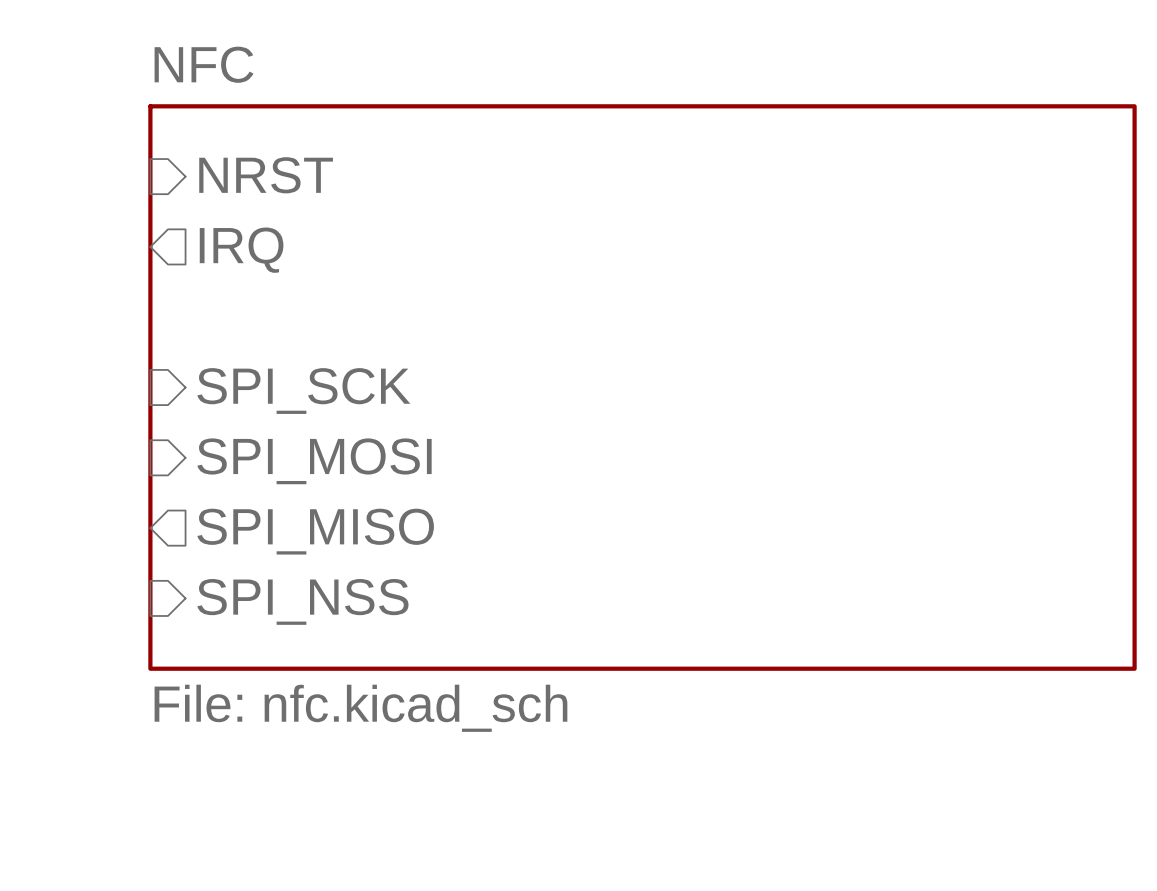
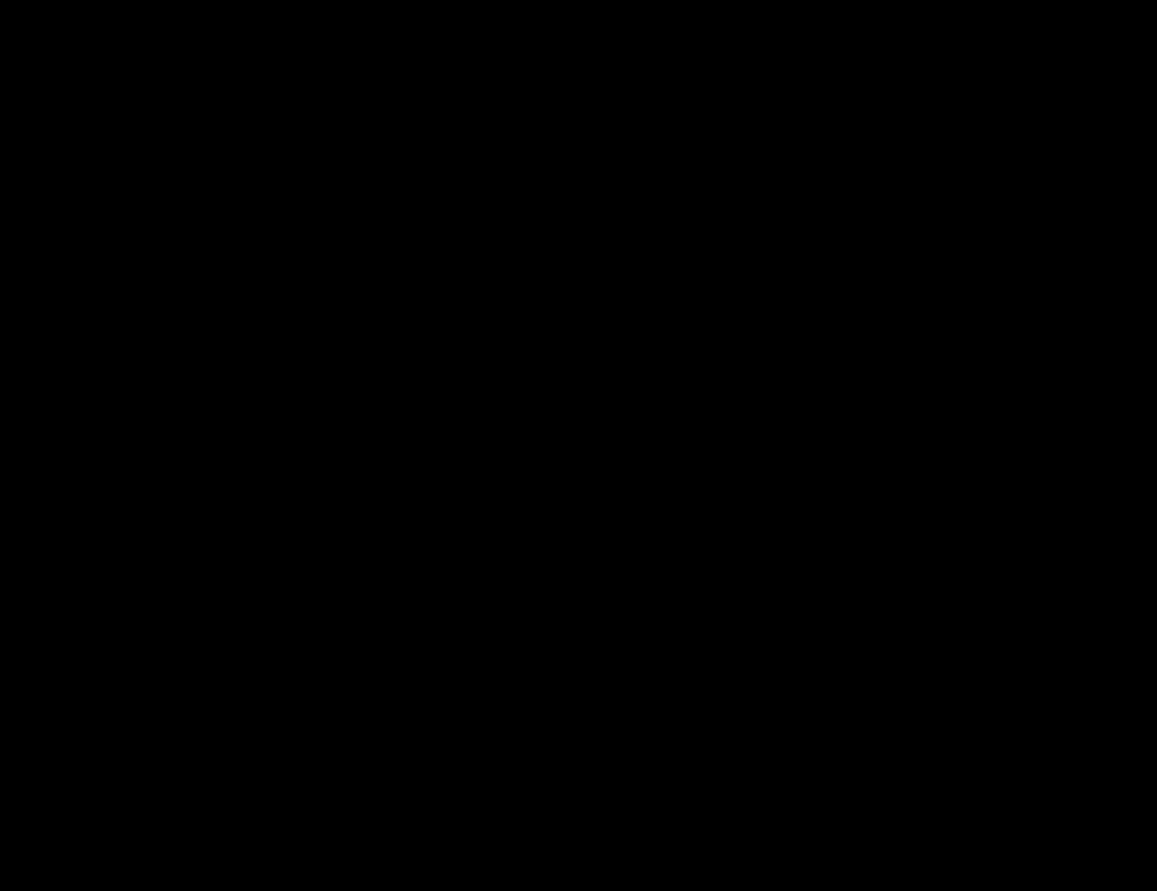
sheet pin: NRST (266, 175) -> none
sheet pin: IRQ (241, 250) -> none
sheet NFC: File: nfc.kicad_sch (642, 387) -> none
sheet pin: SPI_SCK (303, 391) -> none
sheet pin: SPI_MOSI (314, 461) -> none
sheet pin: SPI_MISO (315, 531) -> none
sheet pin: SPI_NSS (302, 601) -> none

